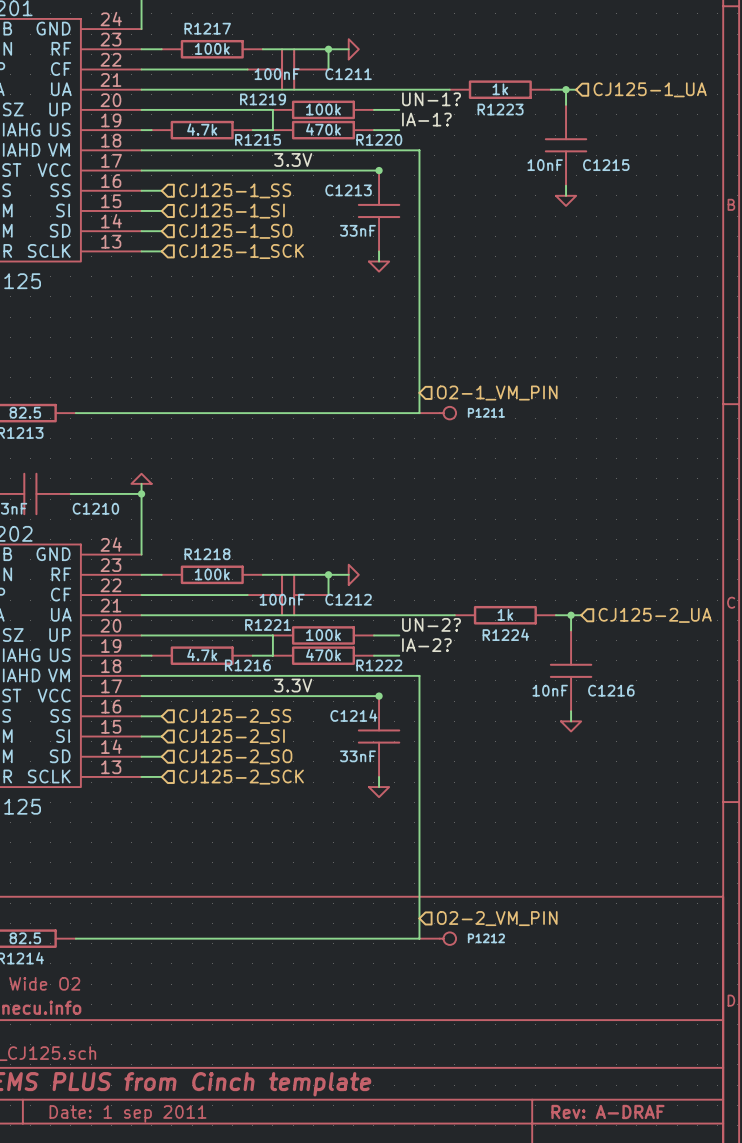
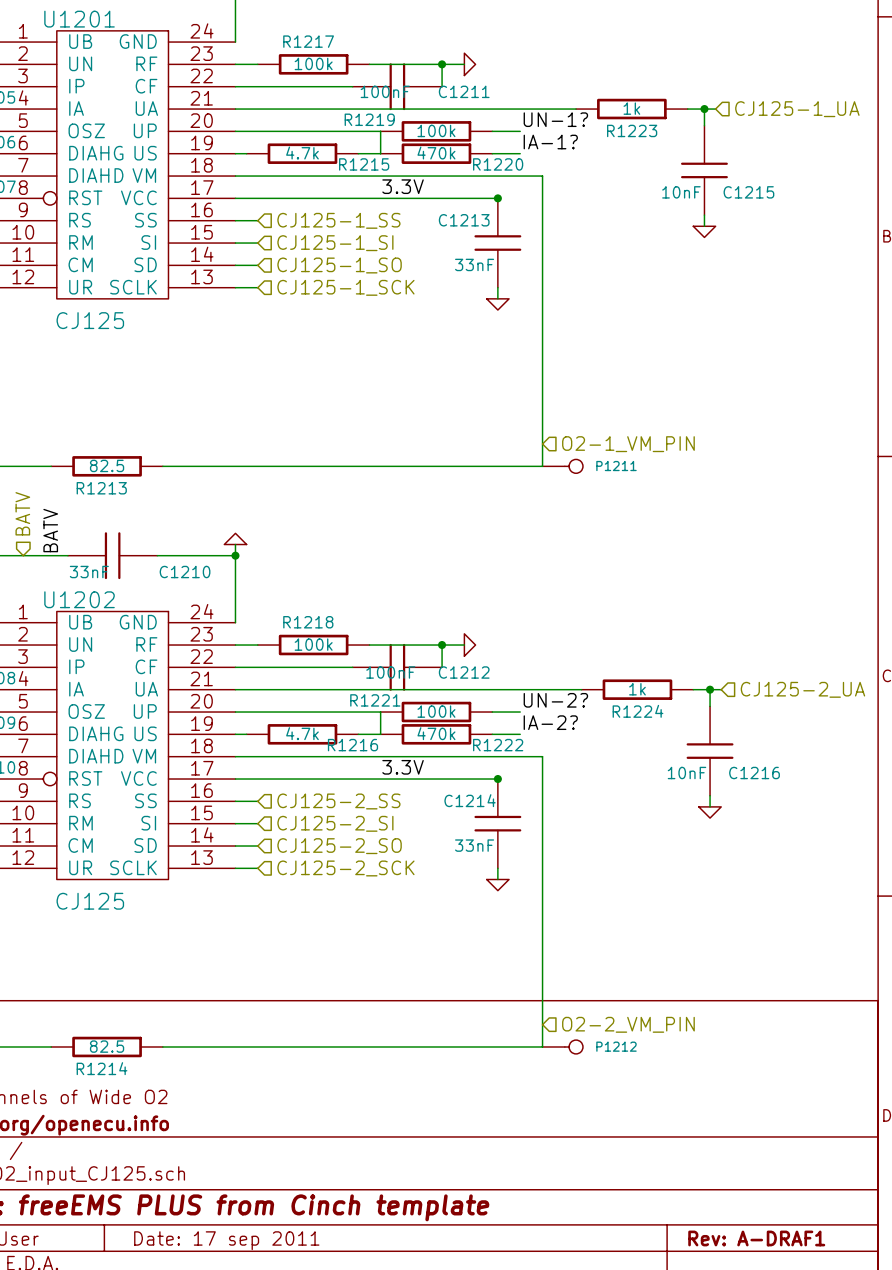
title block: Rev: A-DRAF (607, 1111) -> Rev: A-DRAF1 (756, 1238)
title block: Date: 1 sep 2011 (127, 1113) -> Date: 17 sep 2011 (226, 1240)

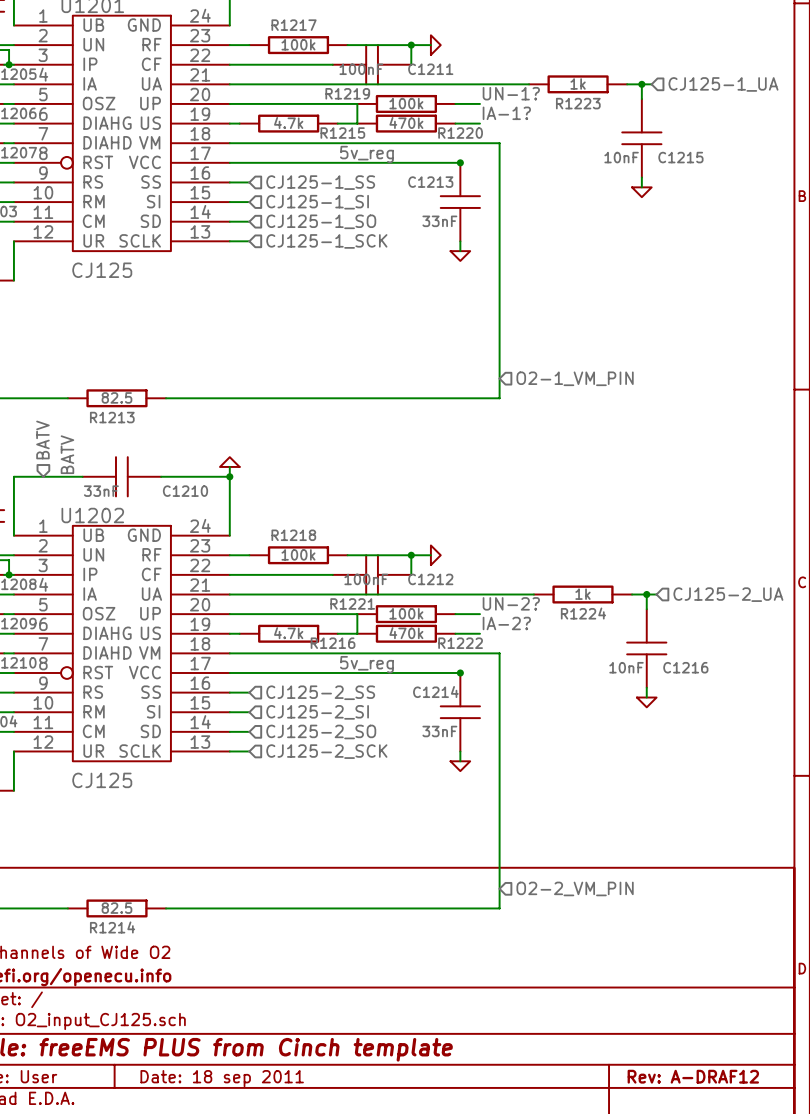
label: 3.3V (403, 186) -> 5v_reg (366, 154)
P1211: (562, 466) -> none
label: 3.3V (403, 767) -> 5v_reg (366, 664)
P1212: (562, 1046) -> none
title block: Rev: A-DRAF1 (756, 1238) -> Rev: A-DRAF12 (693, 1076)
title block: Date: 17 sep 2011 (226, 1240) -> Date: 18 sep 2011 (222, 1078)

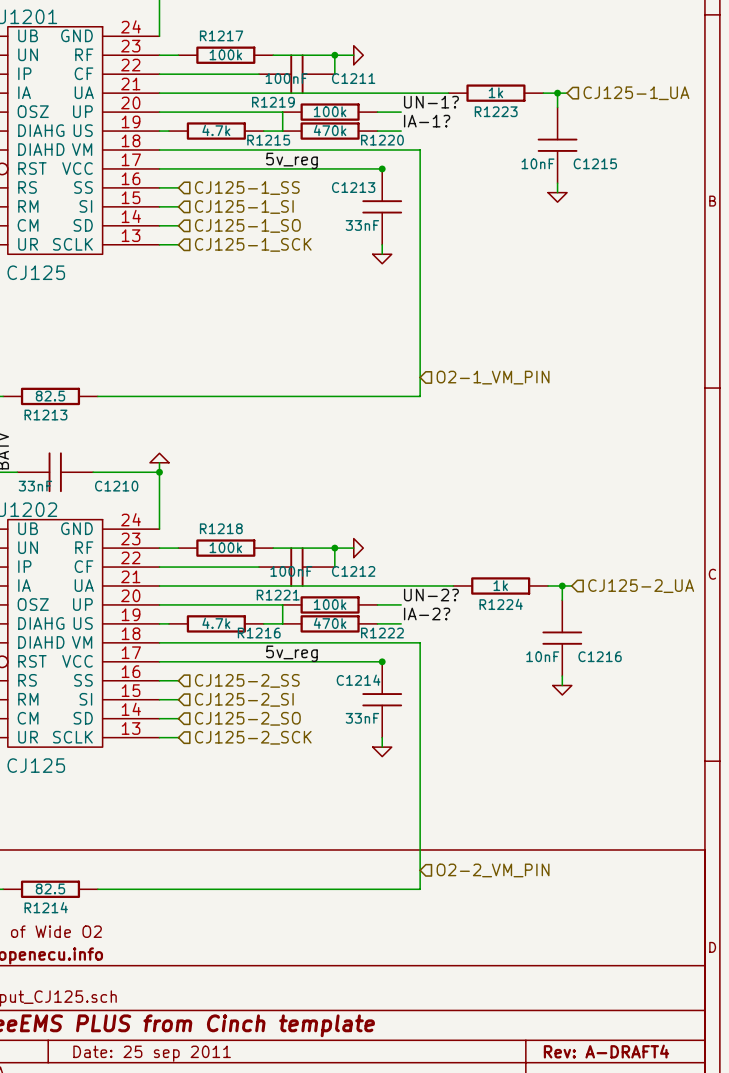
title block: Rev: A-DRAF12 (693, 1076) -> Rev: A-DRAFT4 (606, 1051)
title block: Date: 18 sep 2011 (222, 1078) -> Date: 25 sep 2011 (152, 1053)

